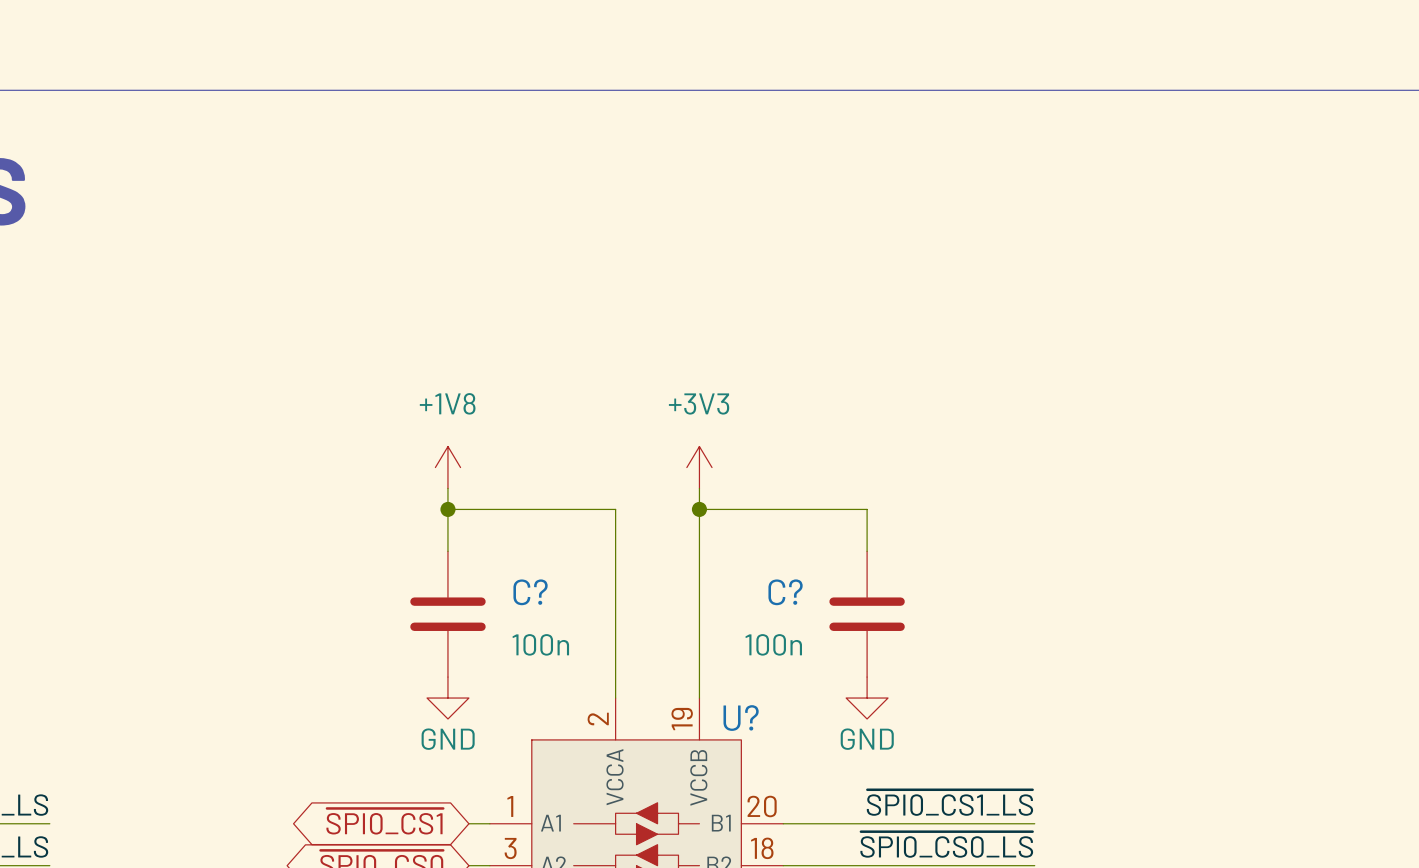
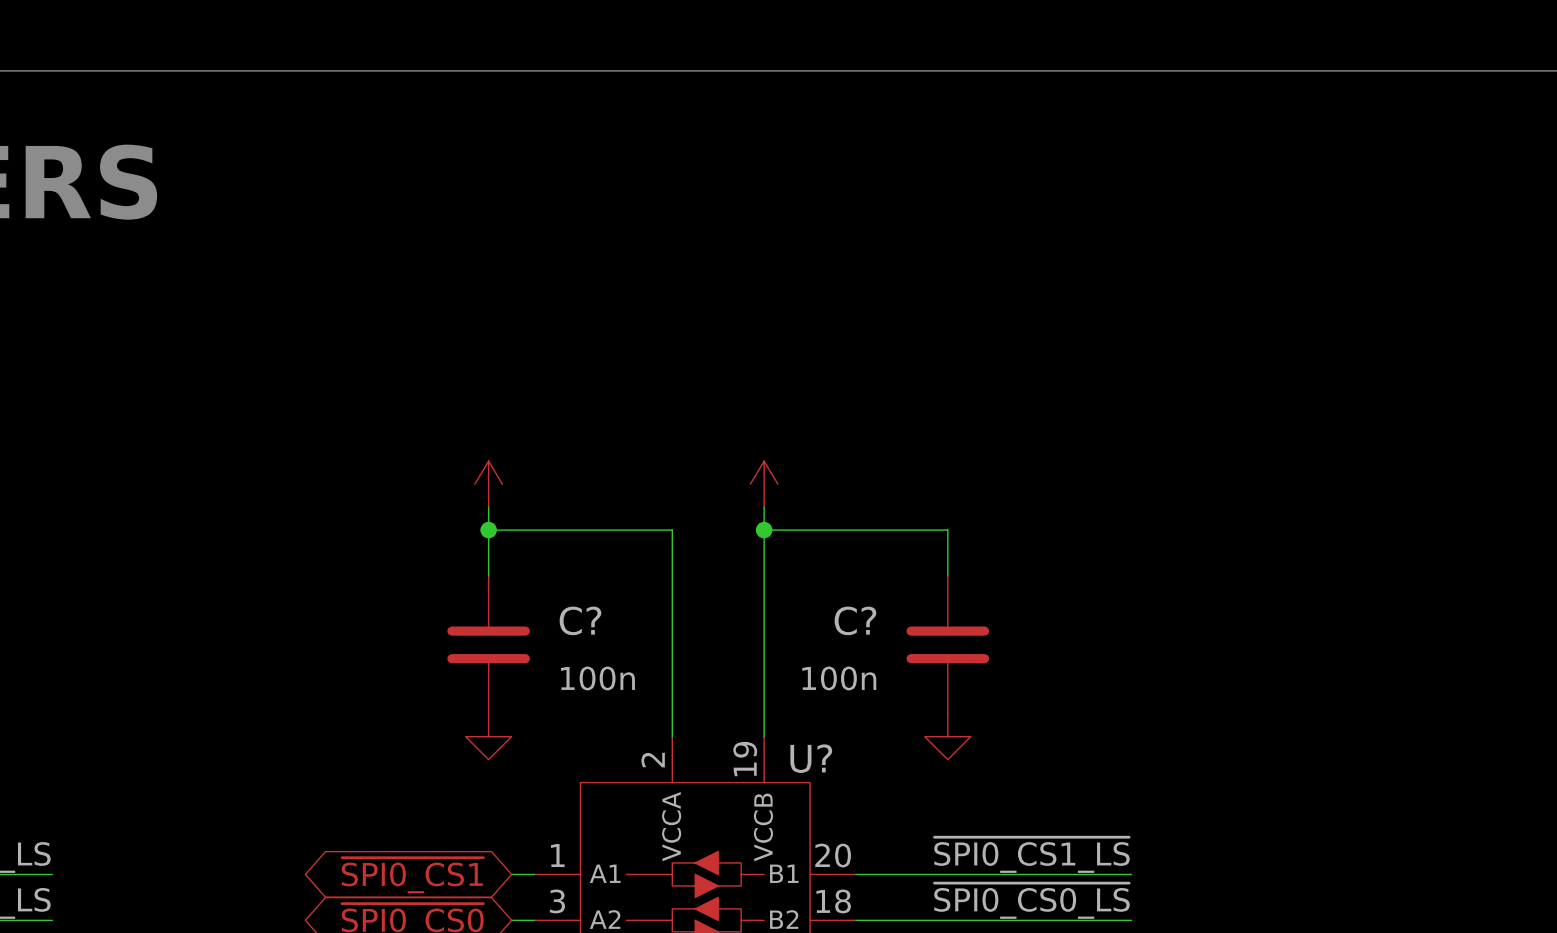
power symbol text: +1V8 (447, 403) -> none
power symbol text: +3V3 (699, 403) -> none
power symbol text: GND (448, 739) -> none
power symbol text: GND (867, 739) -> none

